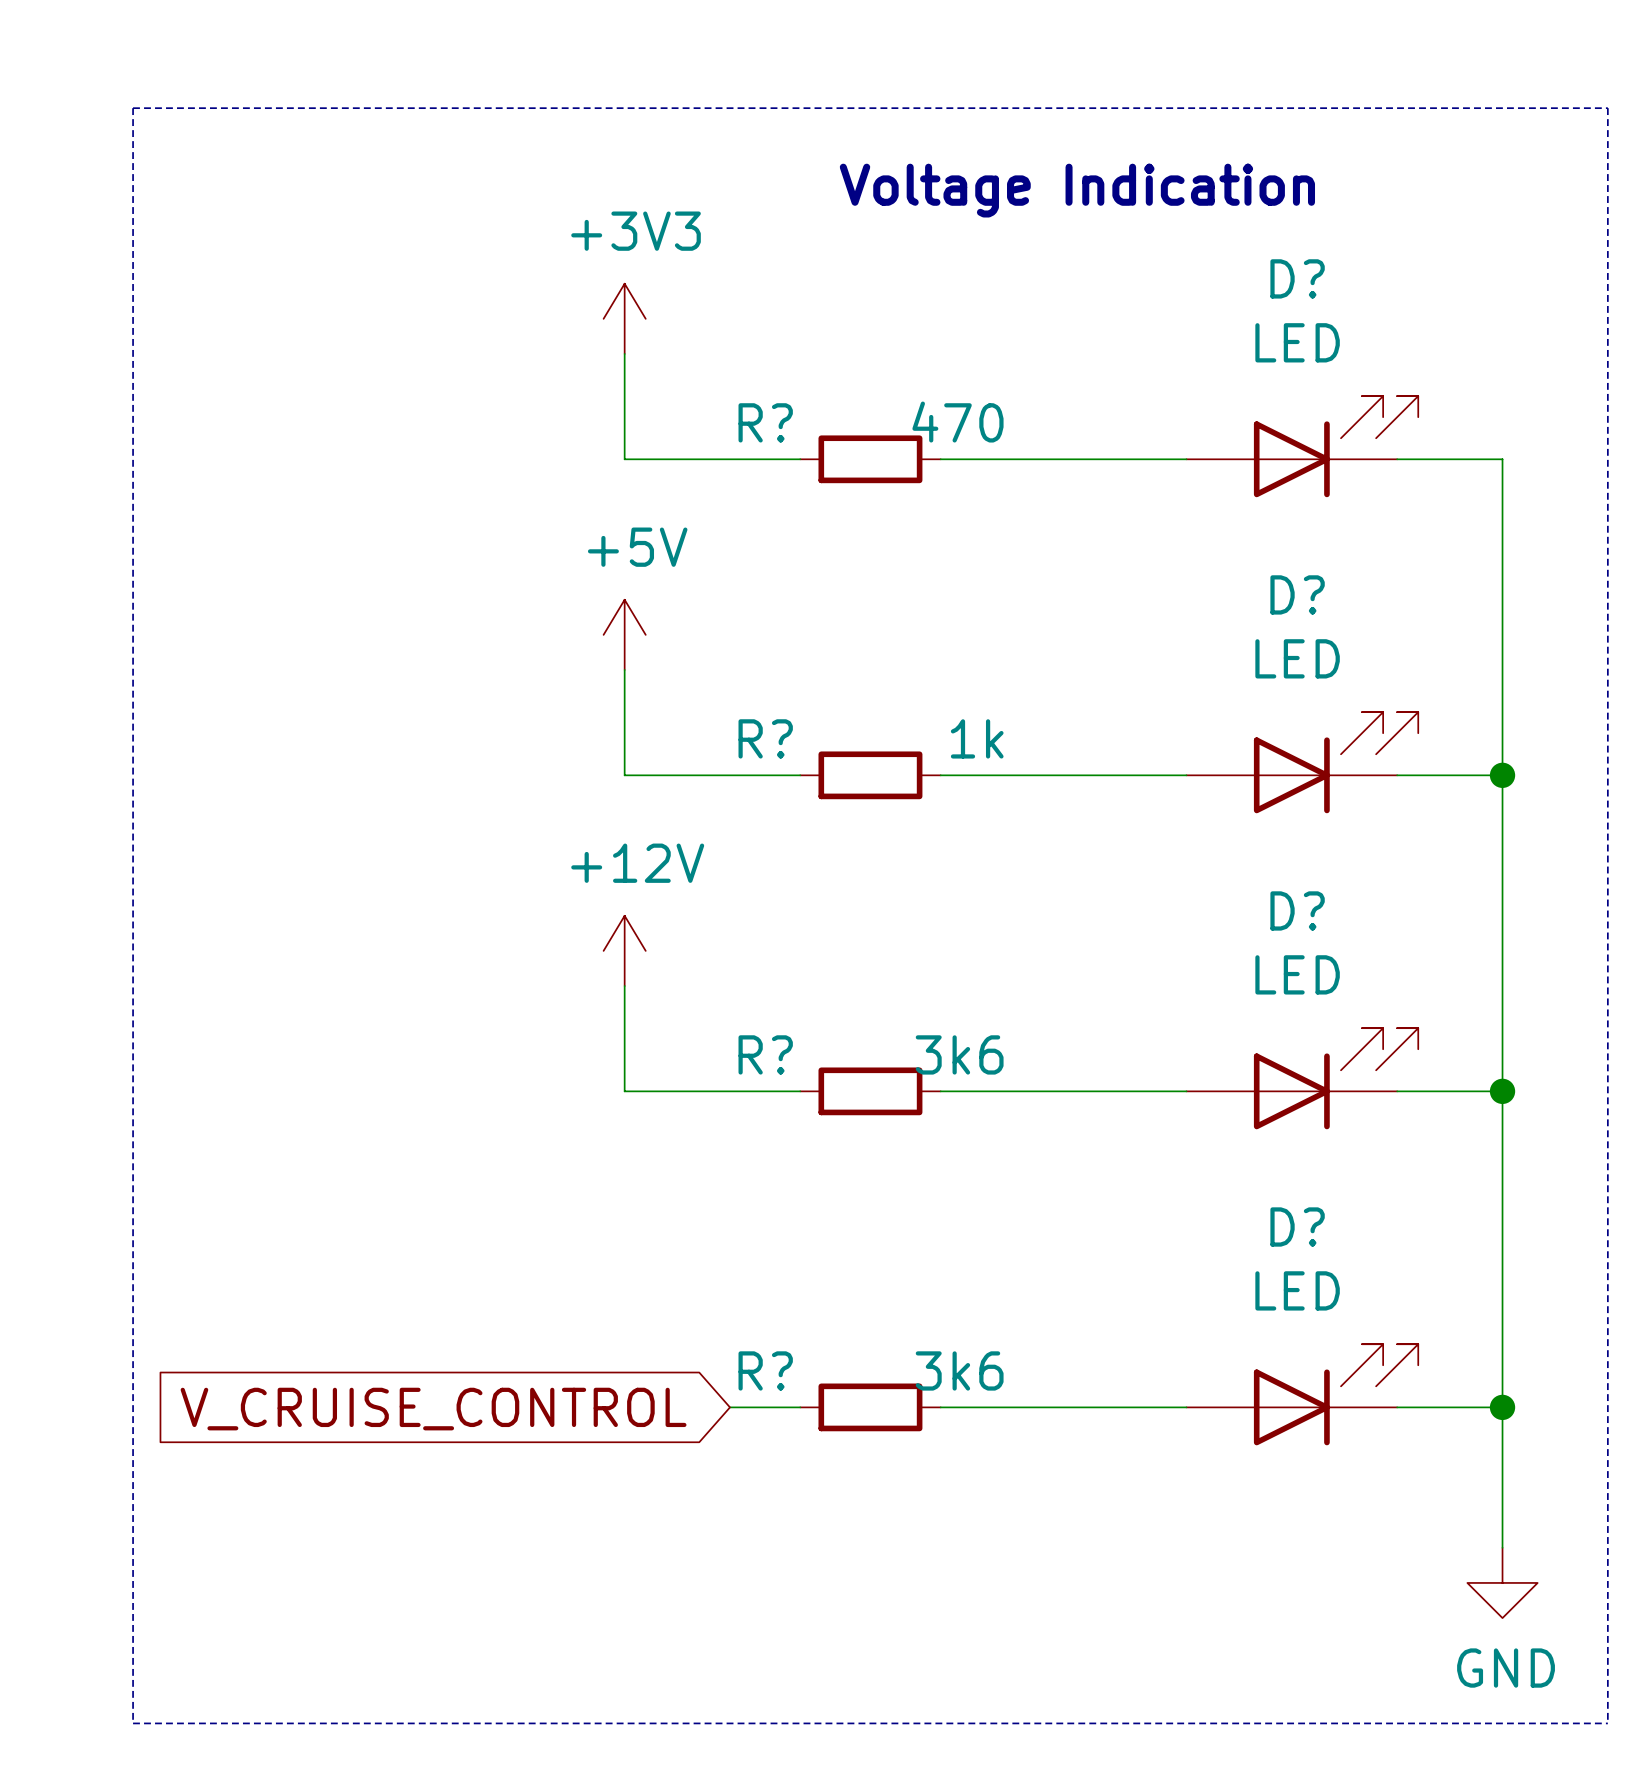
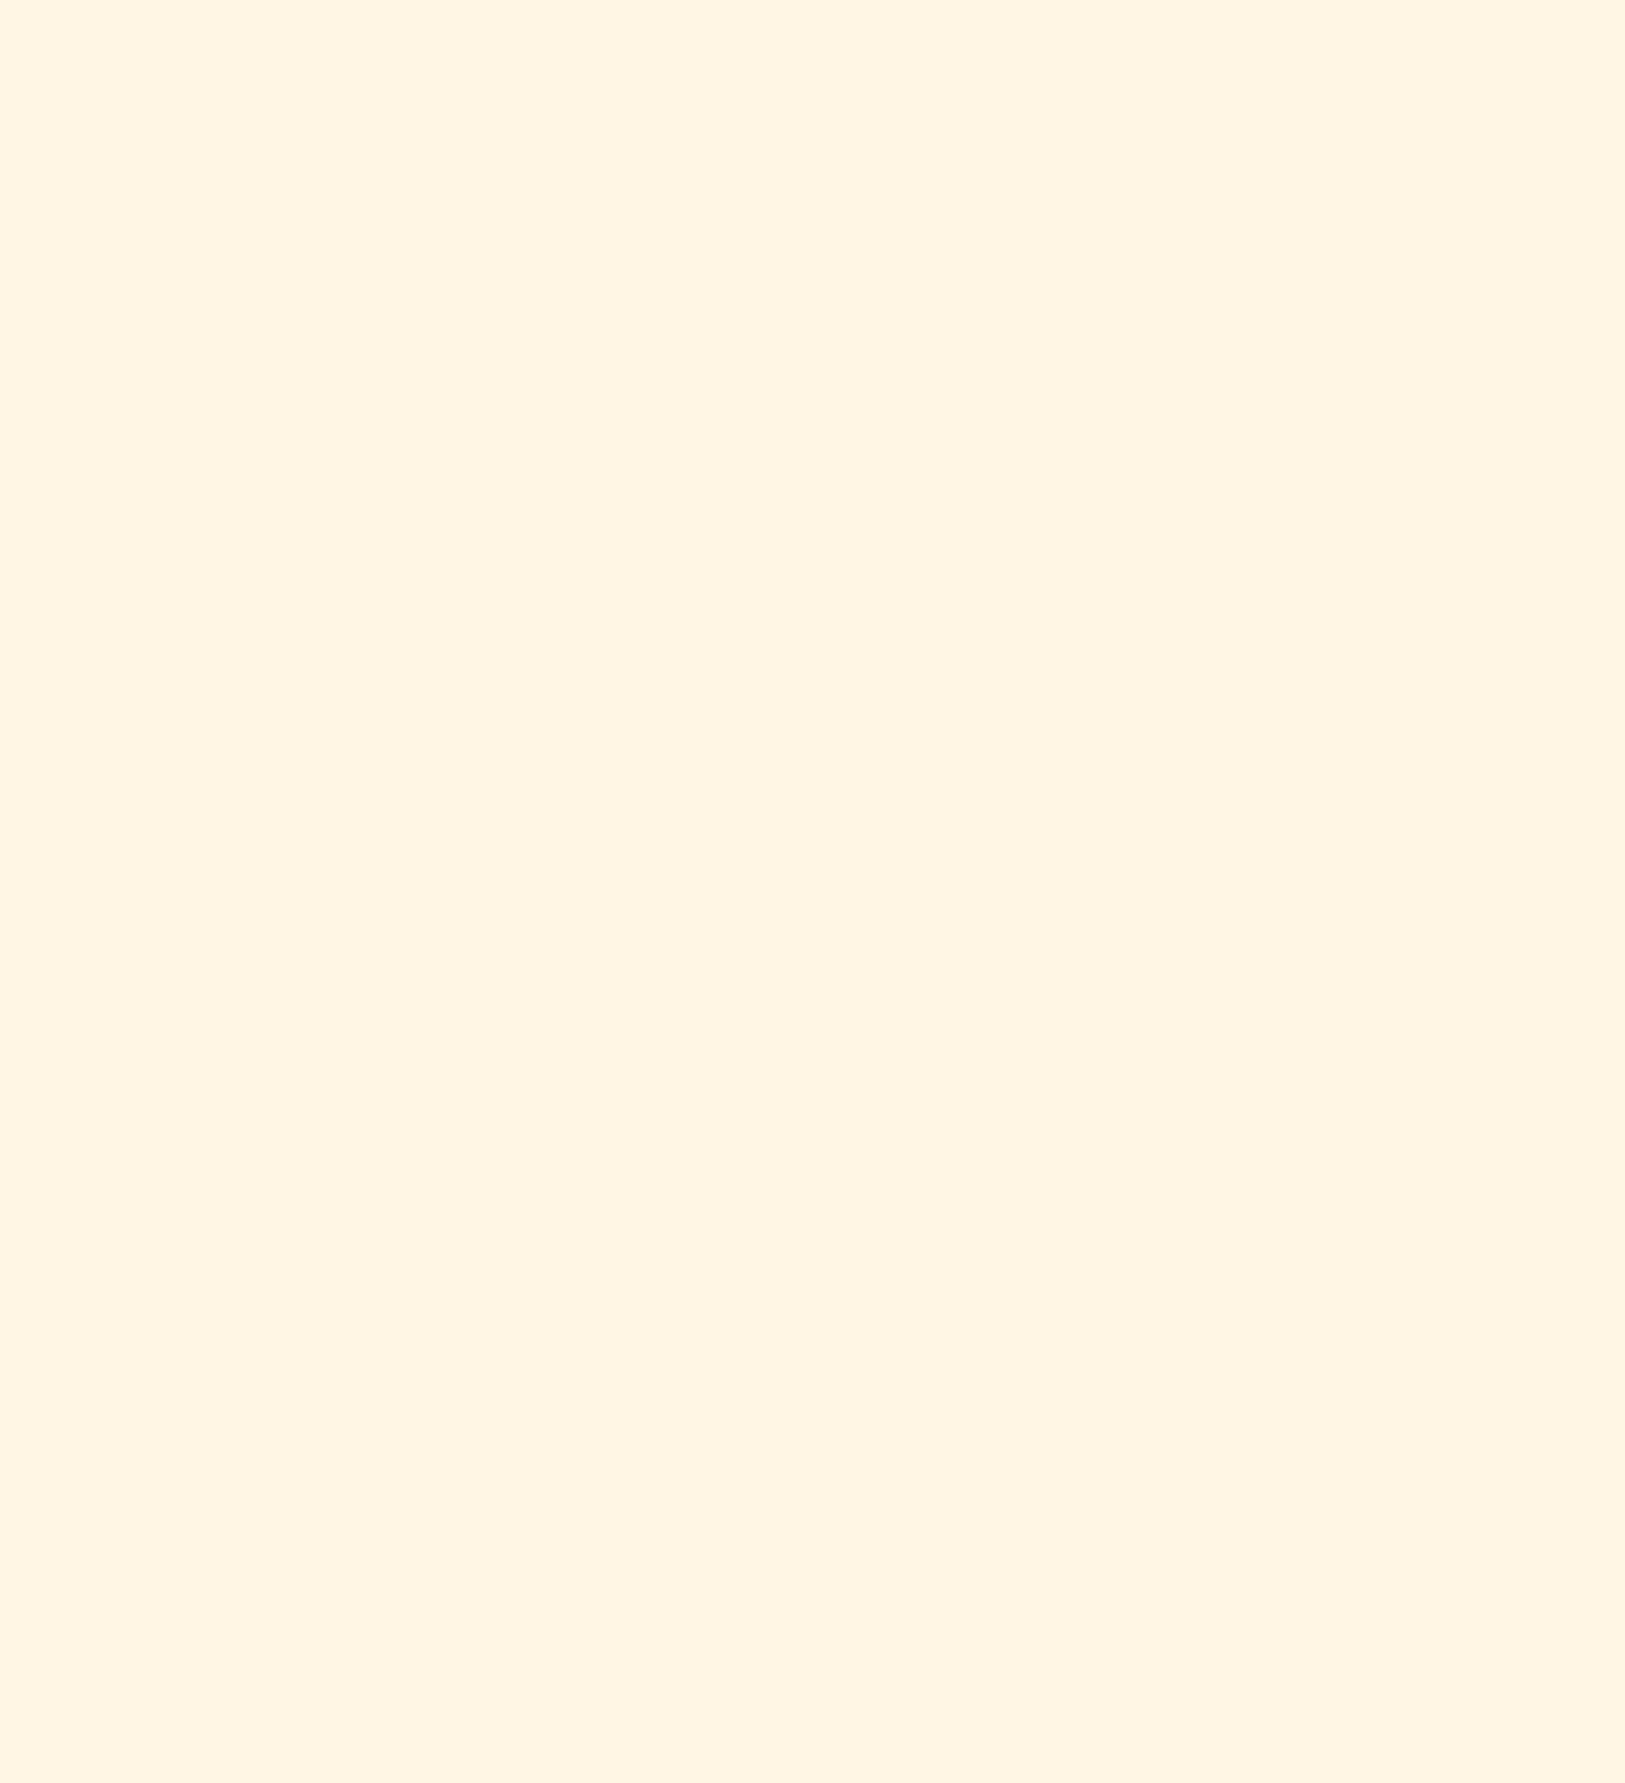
line: (133, 108) (133, 1723) (1607, 1723) (1607, 108) (133, 108) -> none
text: Voltage Indication (1077, 190) -> none
power symbol: +3V3 (624, 318) -> none
wire: (624, 353) (624, 459) (800, 459) -> none
D?: LED (1302, 446) -> none
R?: 470 (870, 459) -> none
wire: (940, 459) (1186, 459) -> none
wire: (1397, 459) (1502, 459) (1502, 1547) -> none
power symbol: +5V (624, 634) -> none
wire: (624, 669) (624, 775) (800, 775) -> none
D?: LED (1302, 762) -> none
R?: 1k (870, 775) -> none
wire: (940, 775) (1186, 775) -> none
wire: (1397, 775) (1502, 775) -> none
junction: (1502, 775) -> none
power symbol: +12V (624, 950) -> none
wire: (624, 986) (624, 1091) (800, 1091) -> none
D?: LED (1302, 1078) -> none
R?: 3k6 (870, 1091) -> none
wire: (940, 1091) (1186, 1091) -> none
wire: (1397, 1091) (1502, 1091) -> none
junction: (1502, 1091) -> none
D?: LED (1302, 1394) -> none
wire: (730, 1407) (800, 1407) -> none
R?: 3k6 (870, 1407) -> none
wire: (940, 1407) (1186, 1407) -> none
wire: (1397, 1407) (1502, 1407) -> none
junction: (1502, 1407) -> none
global label: V_CRUISE_CONTROL (433, 1409) -> none
power symbol: GND (1502, 1582) -> none

